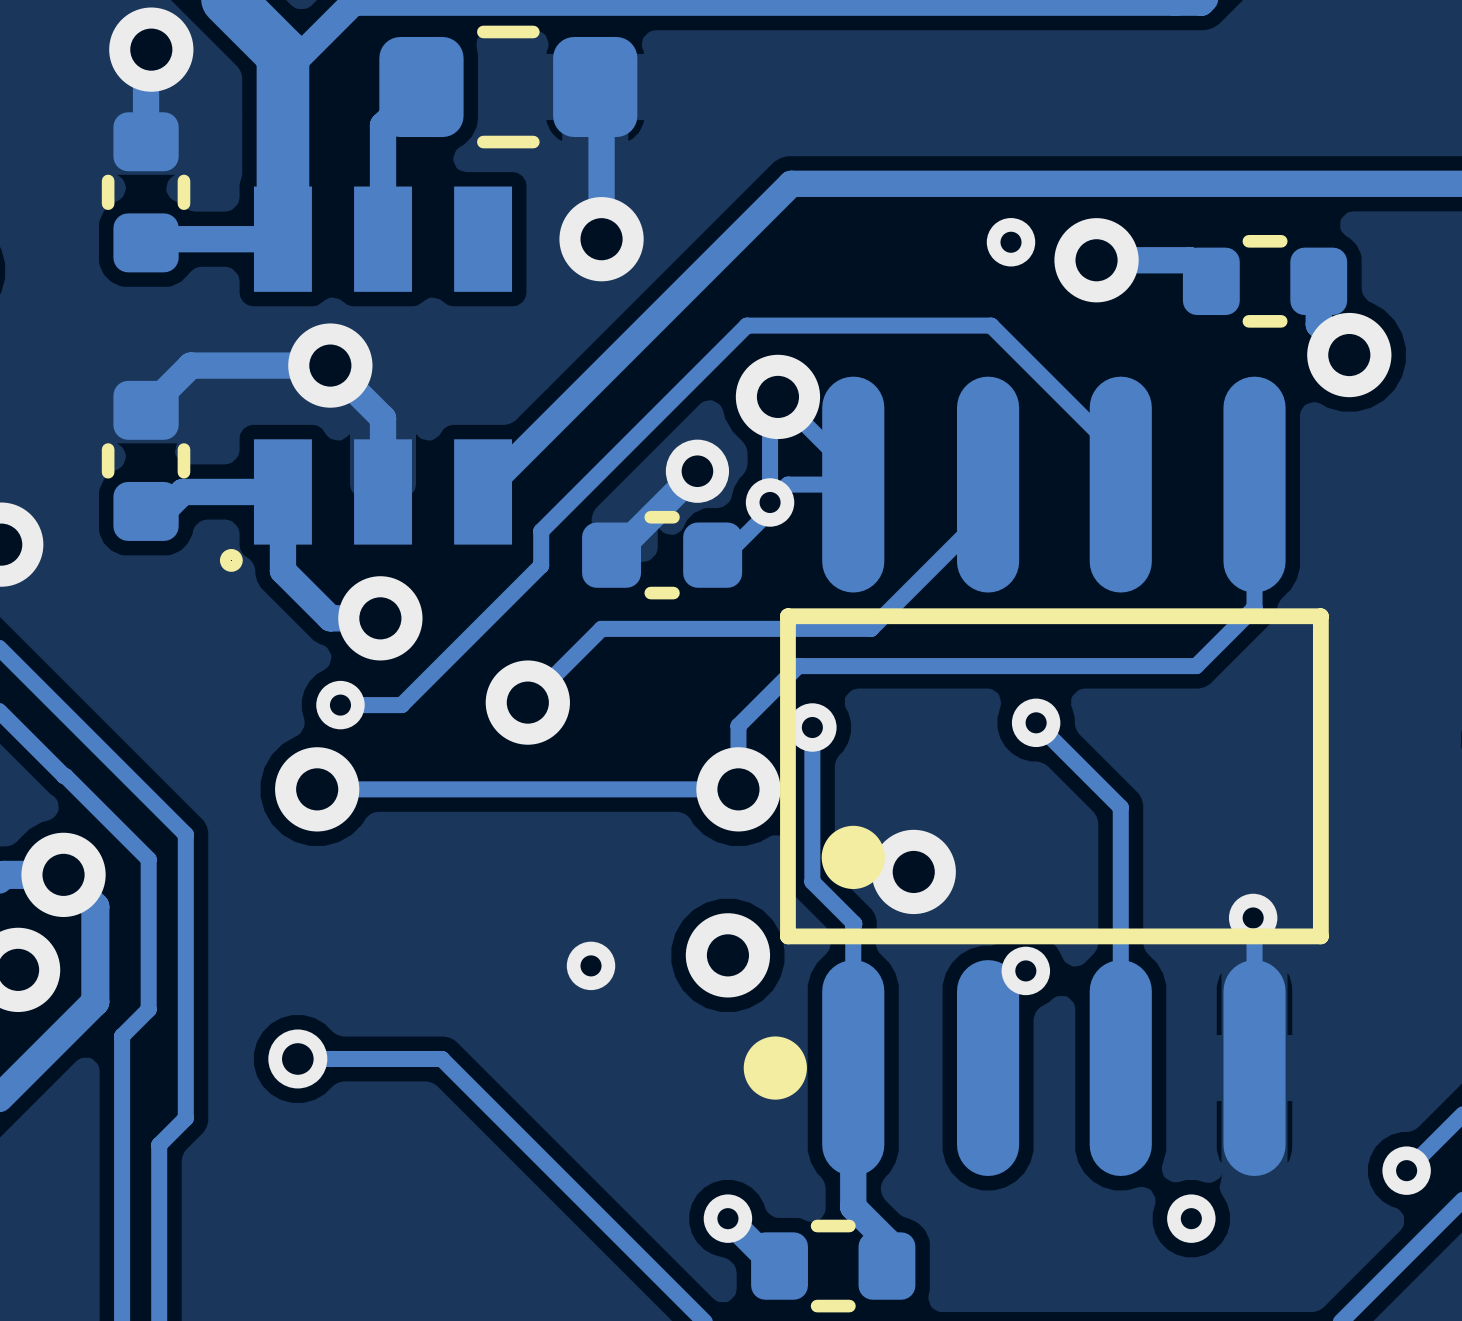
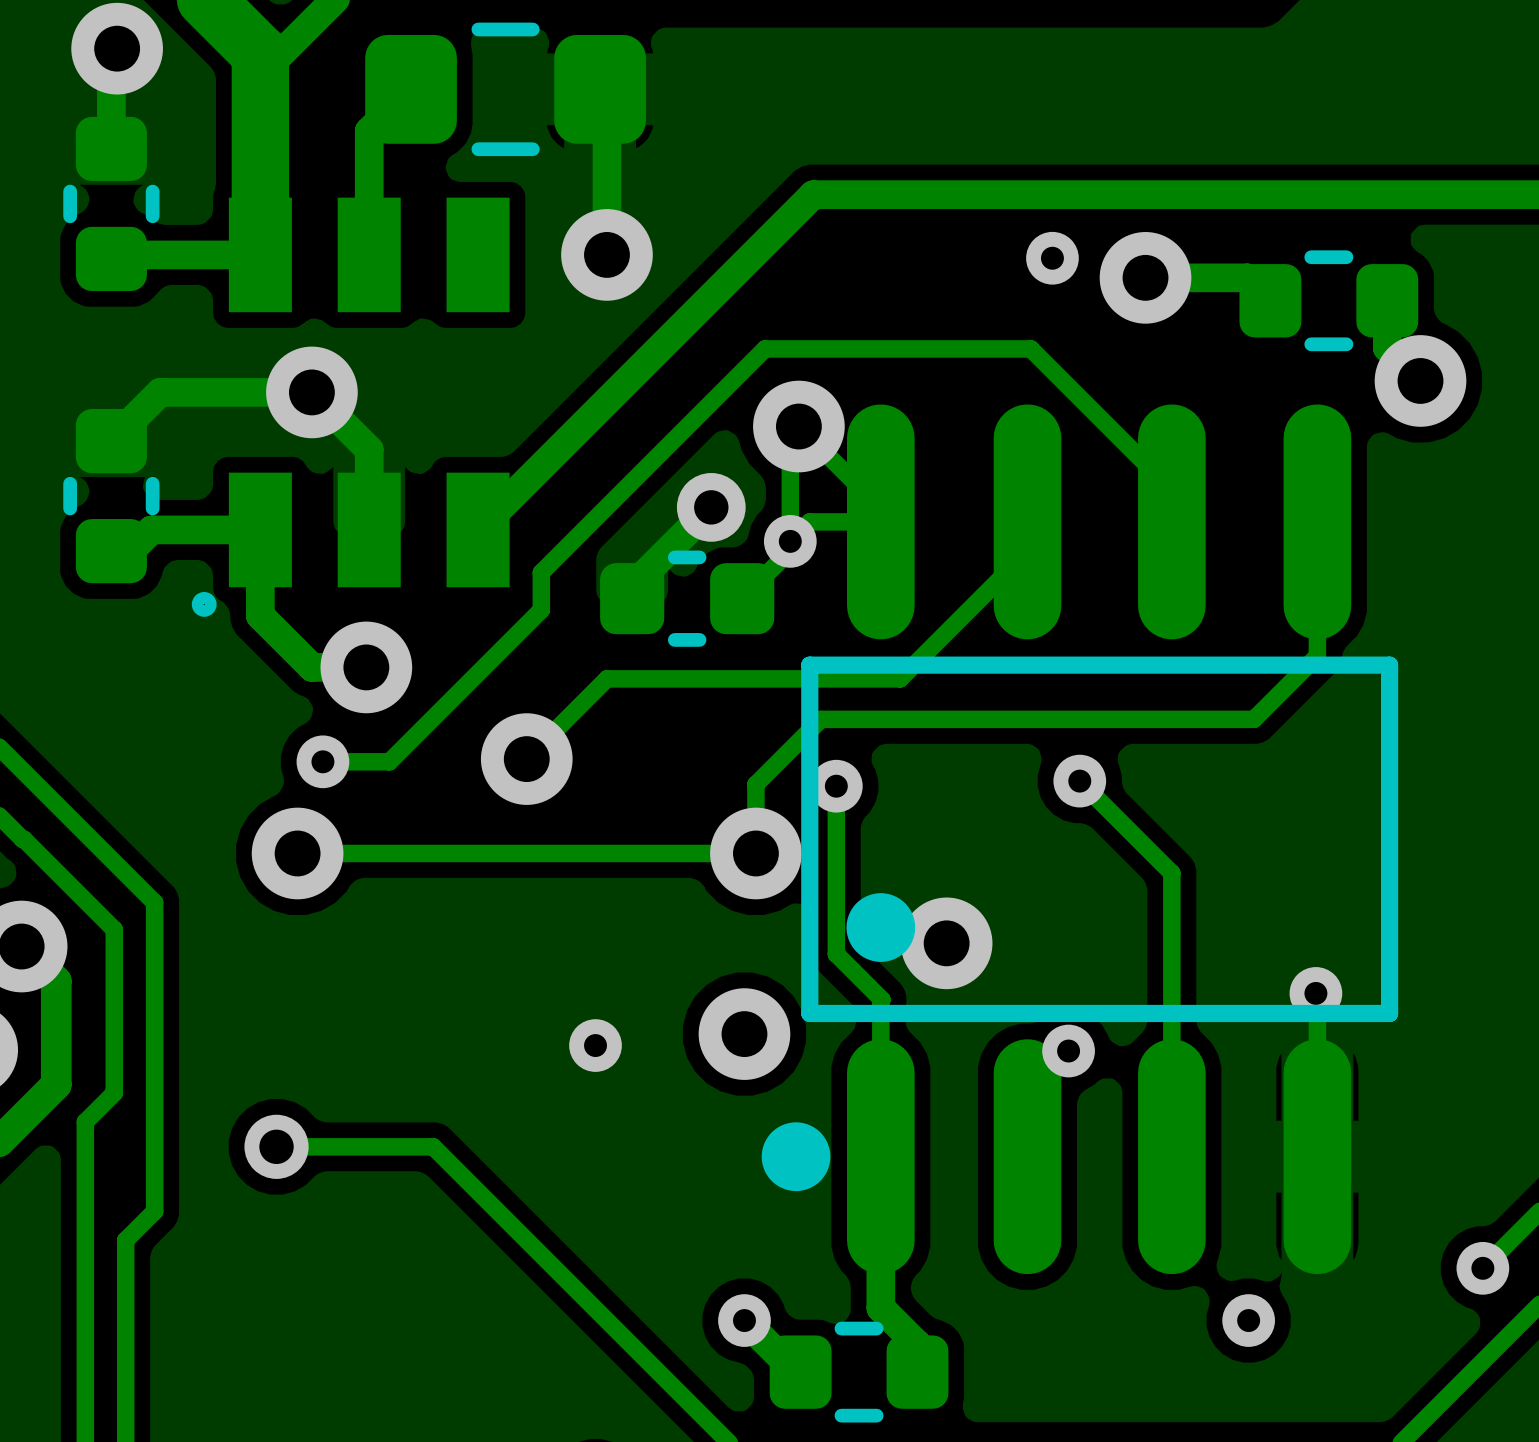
part position: (662, 555) -> (687, 598)

